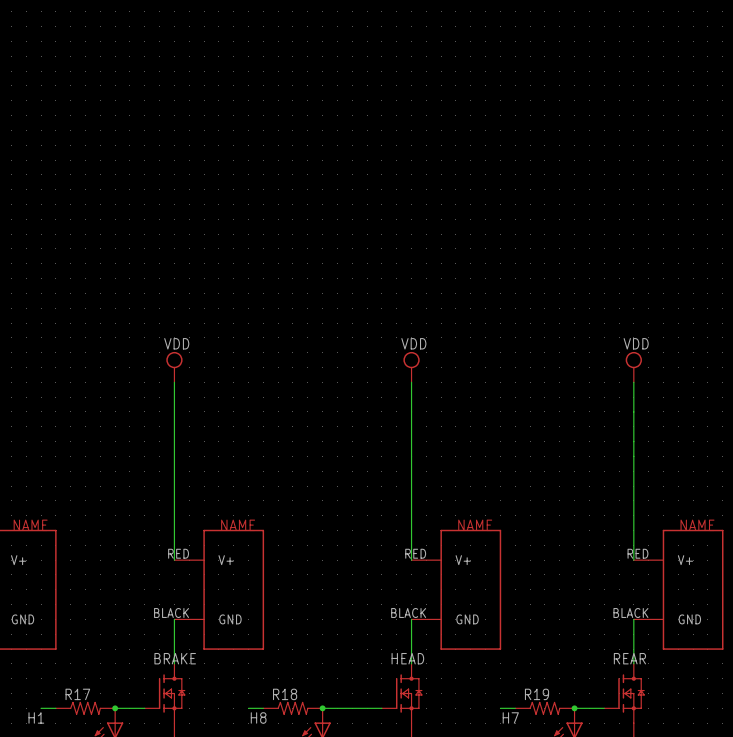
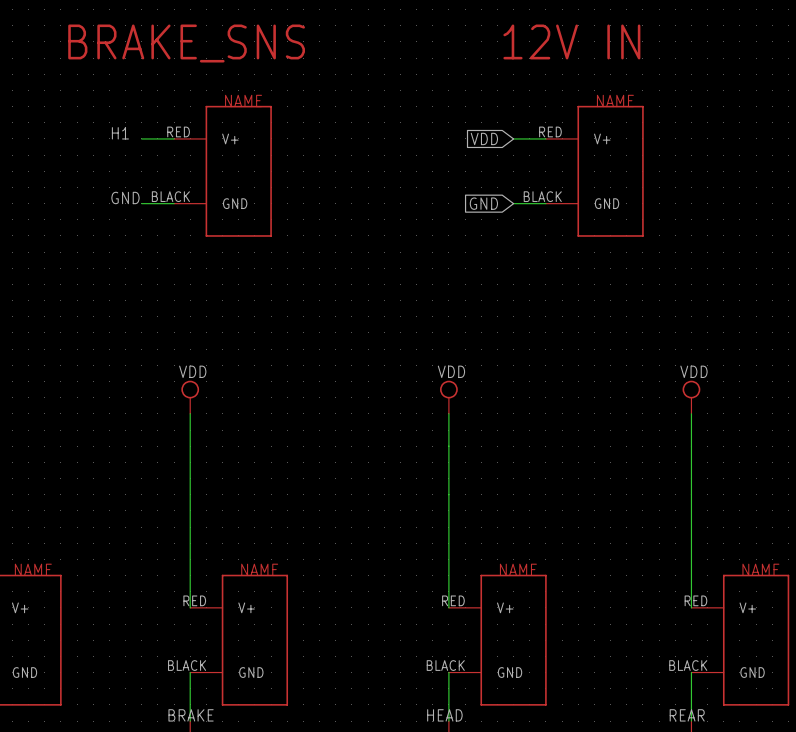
text: none -> 12V IN (571, 41)
text: none -> BRAKE_SNS (186, 43)
label: none -> H1 (120, 133)
wire: none -> (141, 138) (174, 138)
global label: none -> VDD (484, 138)
wire: none -> (513, 138) (545, 138)
part: none -> (222, 171)
part: none -> (594, 171)
label: none -> GND (125, 197)
wire: none -> (141, 203) (174, 203)
global label: none -> GND (483, 203)
wire: none -> (513, 203) (545, 203)

